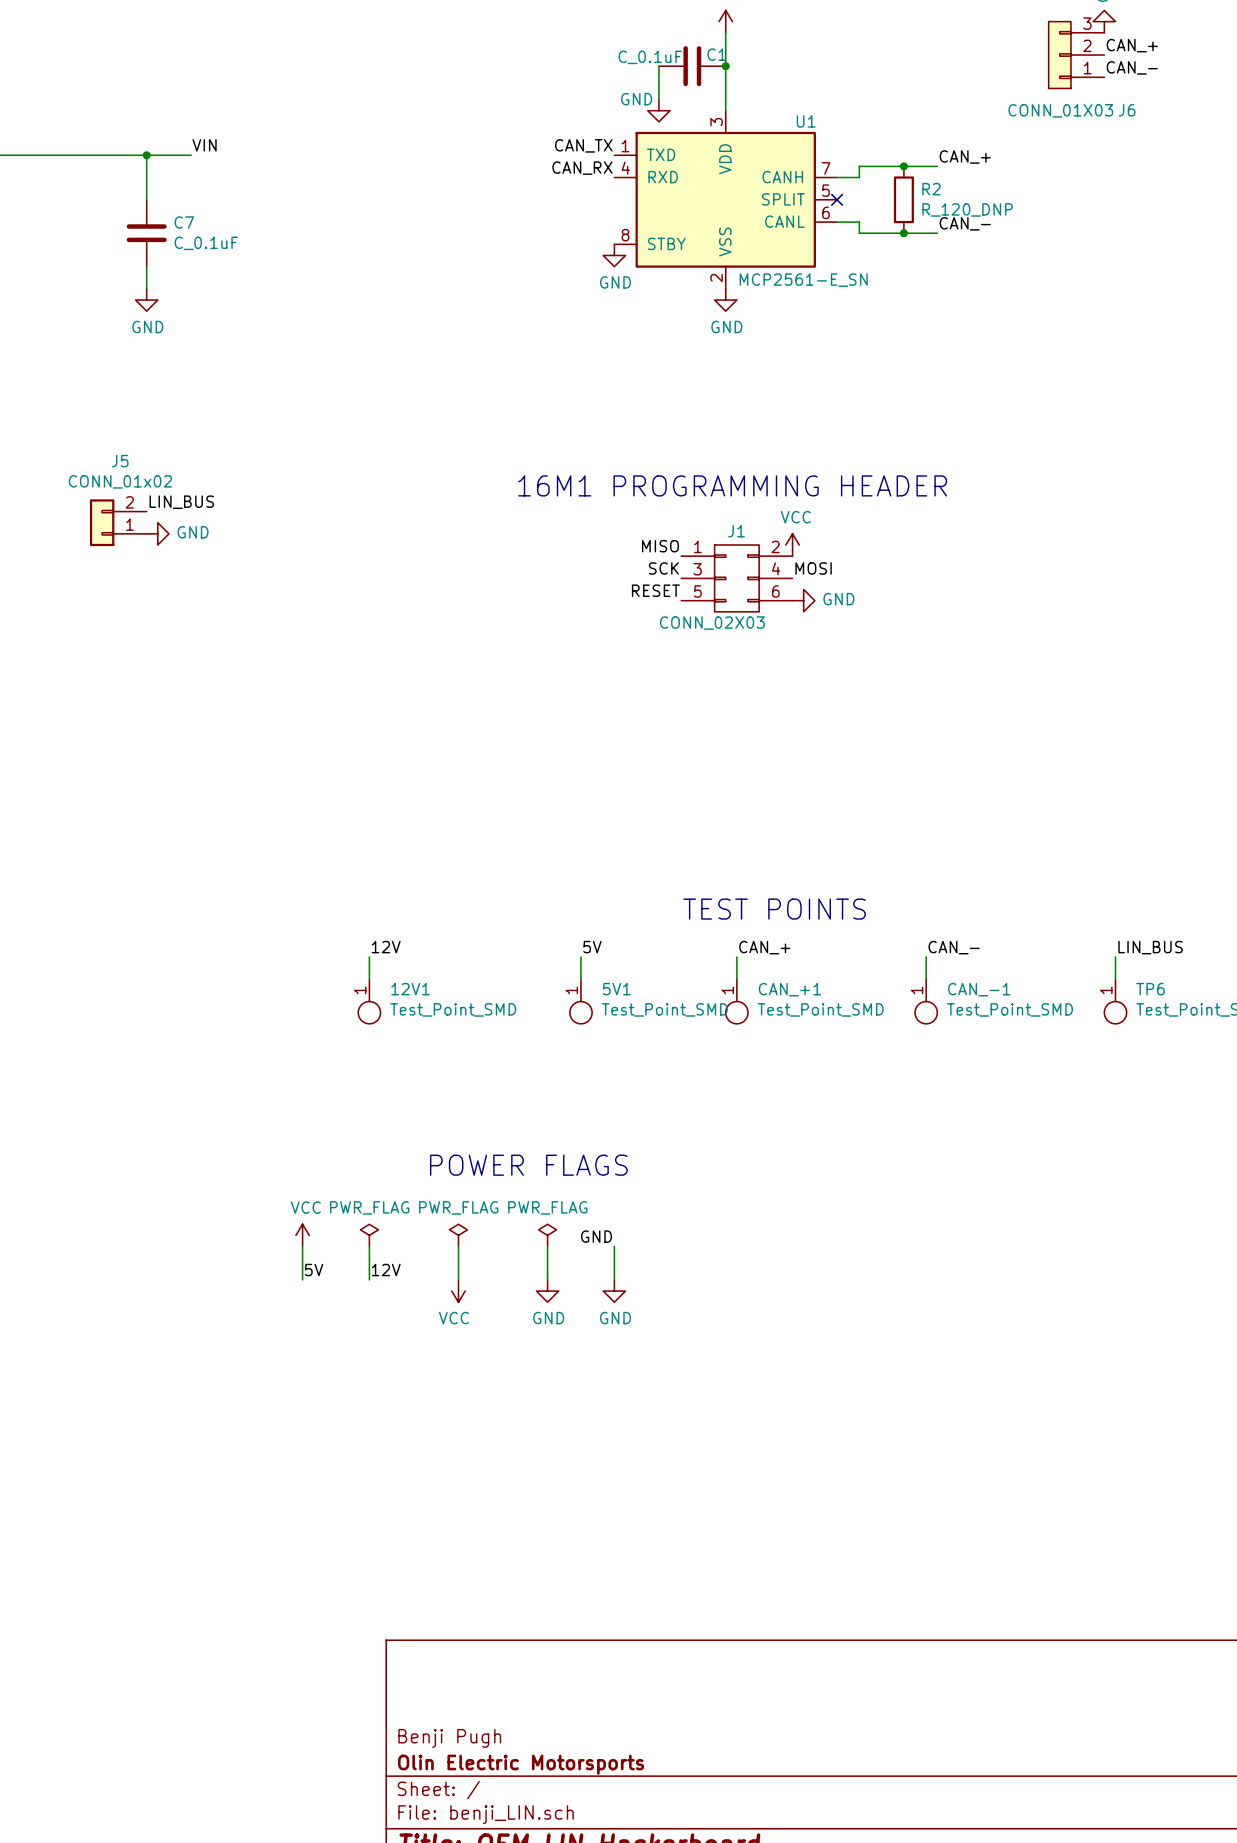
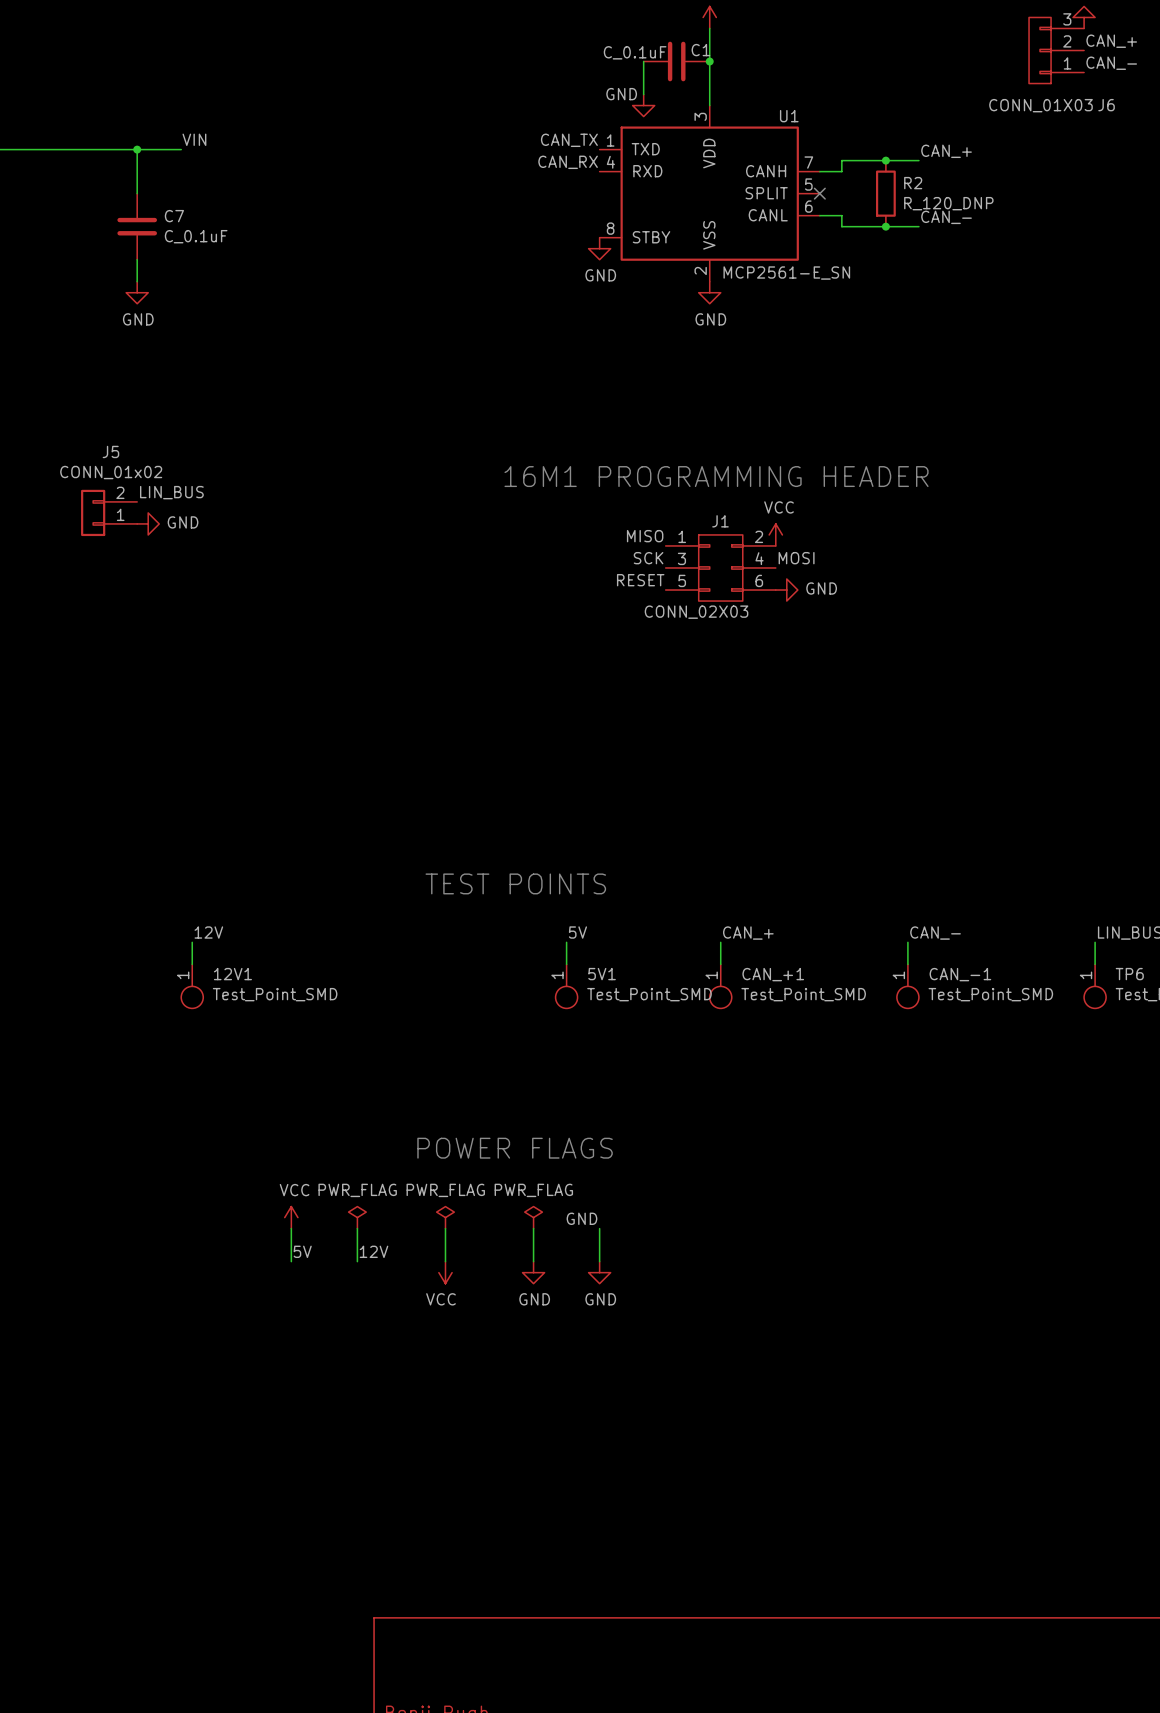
text: none -> TEST POINTS (515, 883)
text: TEST POINTS (774, 909) -> none
label position: 12V (386, 947) -> 12V (208, 932)
wire: (369, 957) (369, 979) -> (192, 942) (192, 964)
12V1 position: (369, 1001) -> (192, 986)

